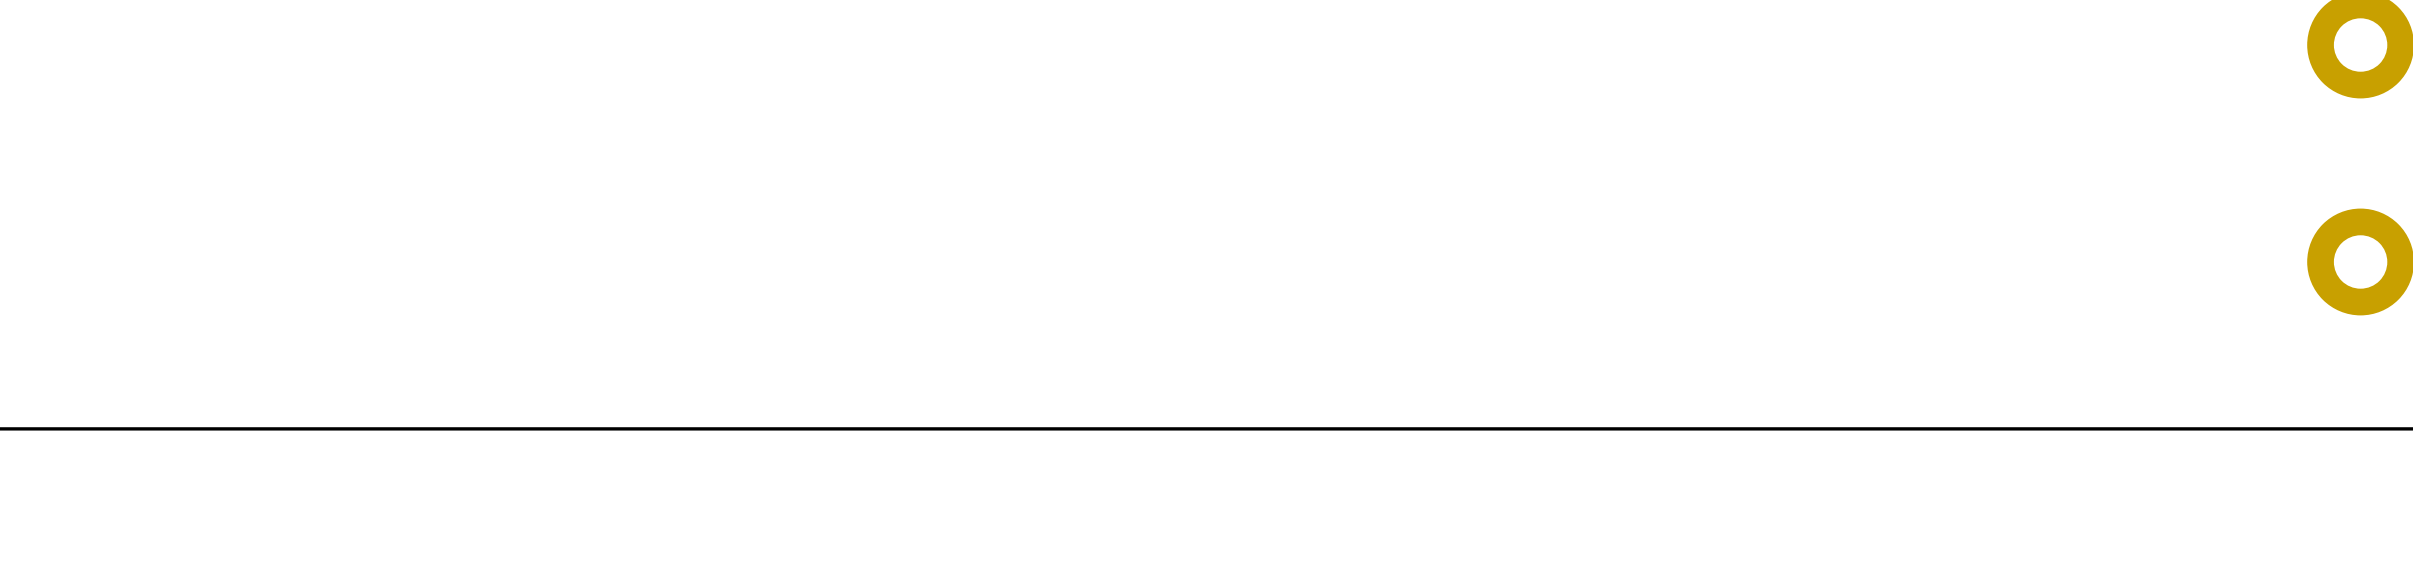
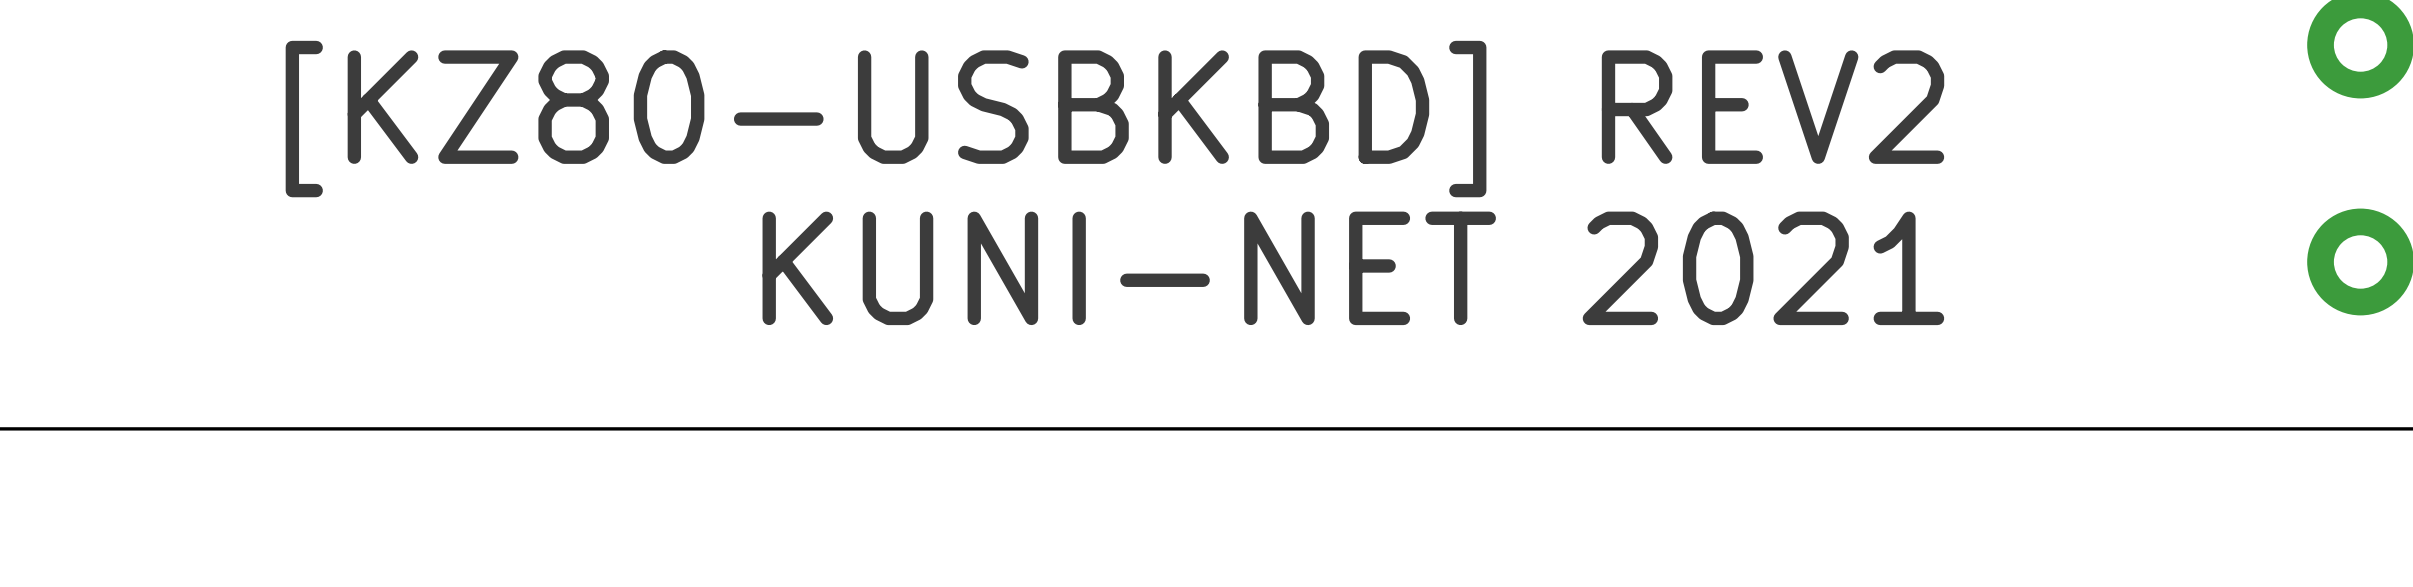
text: none -> [KZ80-USBKBD] REV2 (1114, 119)
text: none -> KUNI-NET 2021 (1353, 268)

